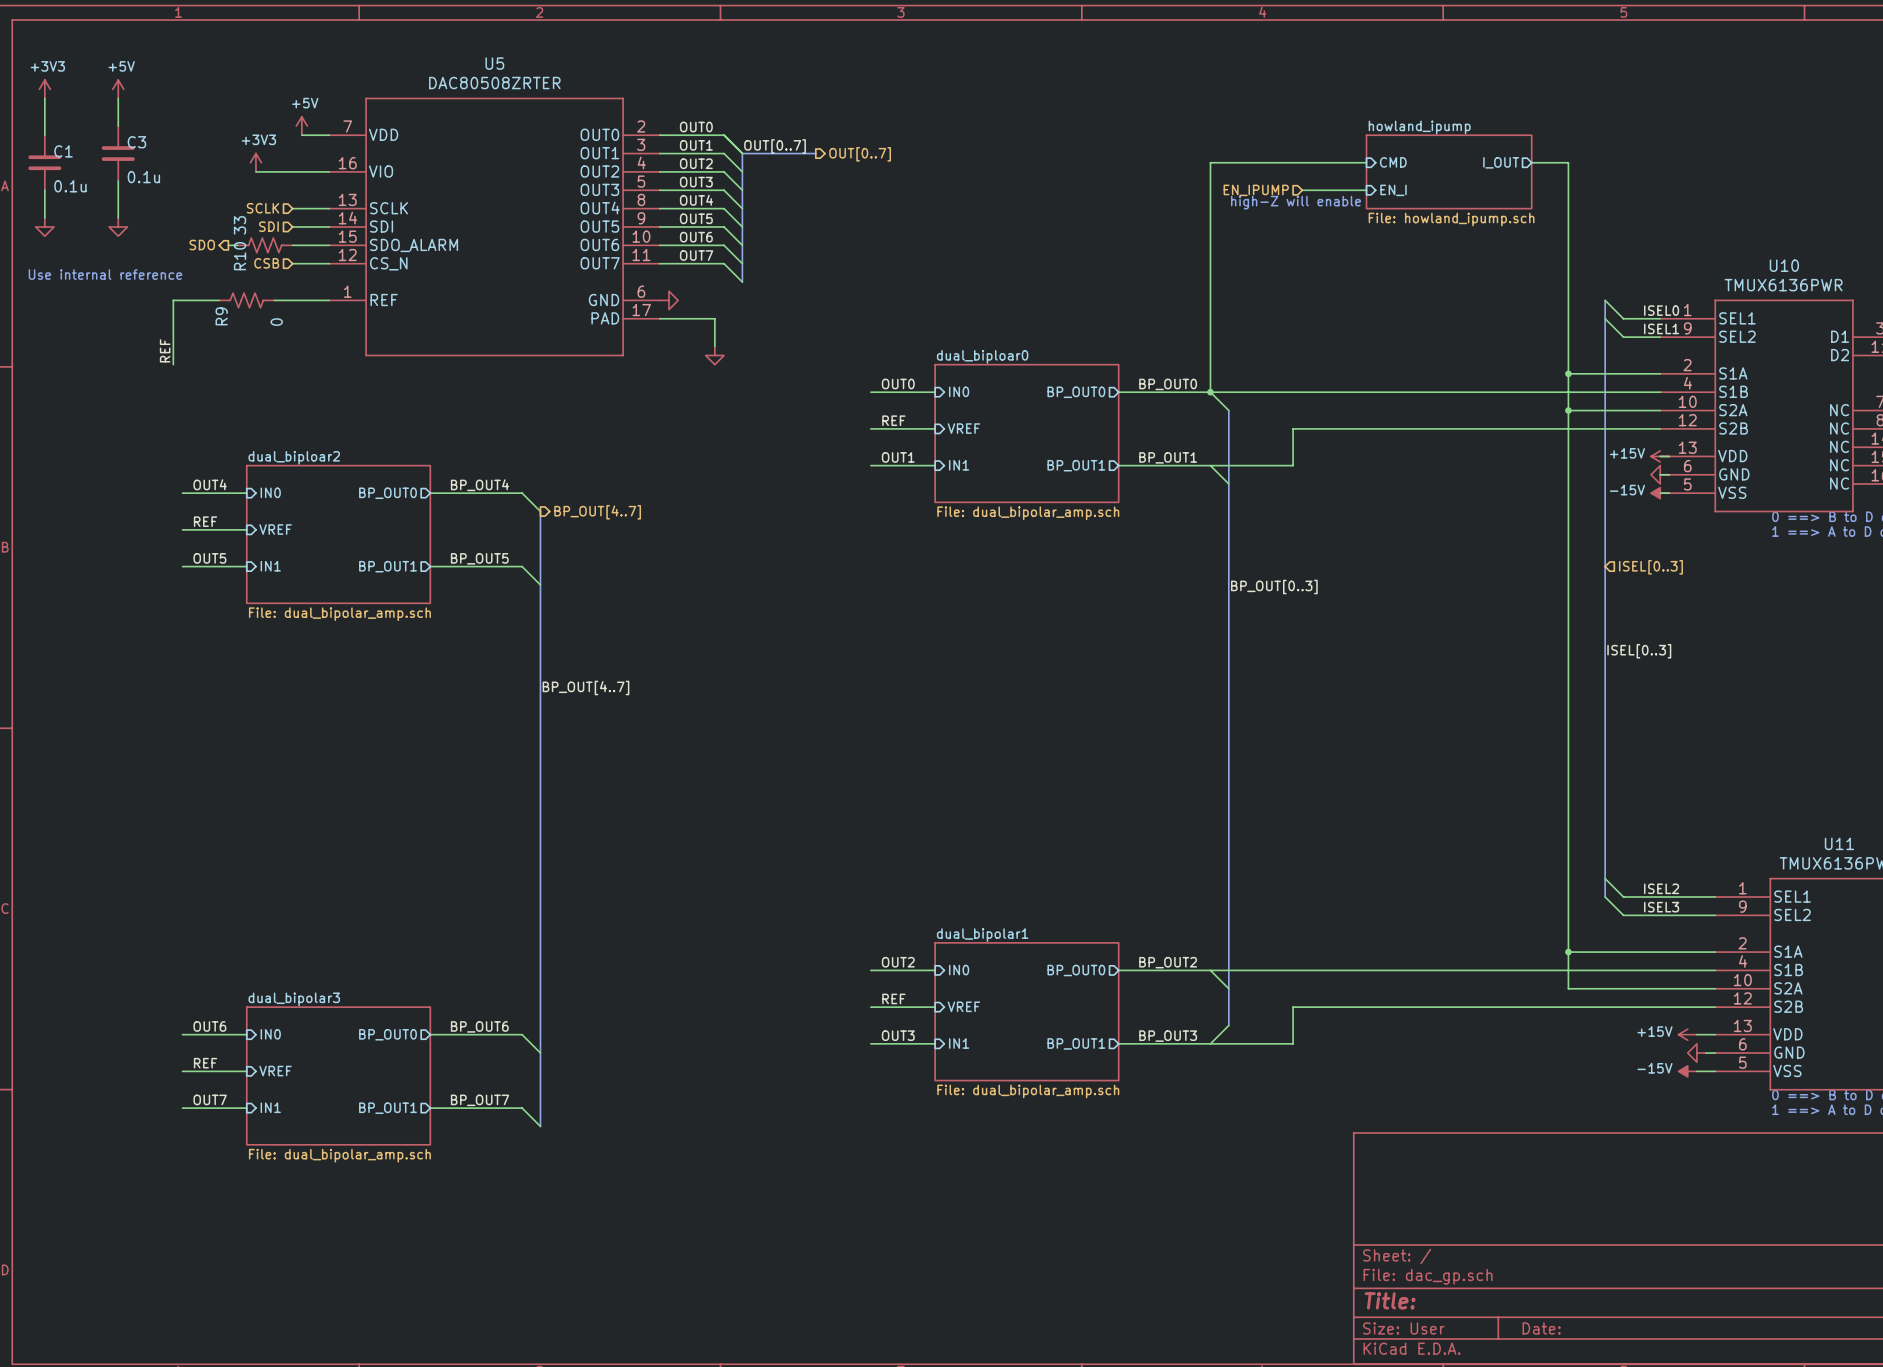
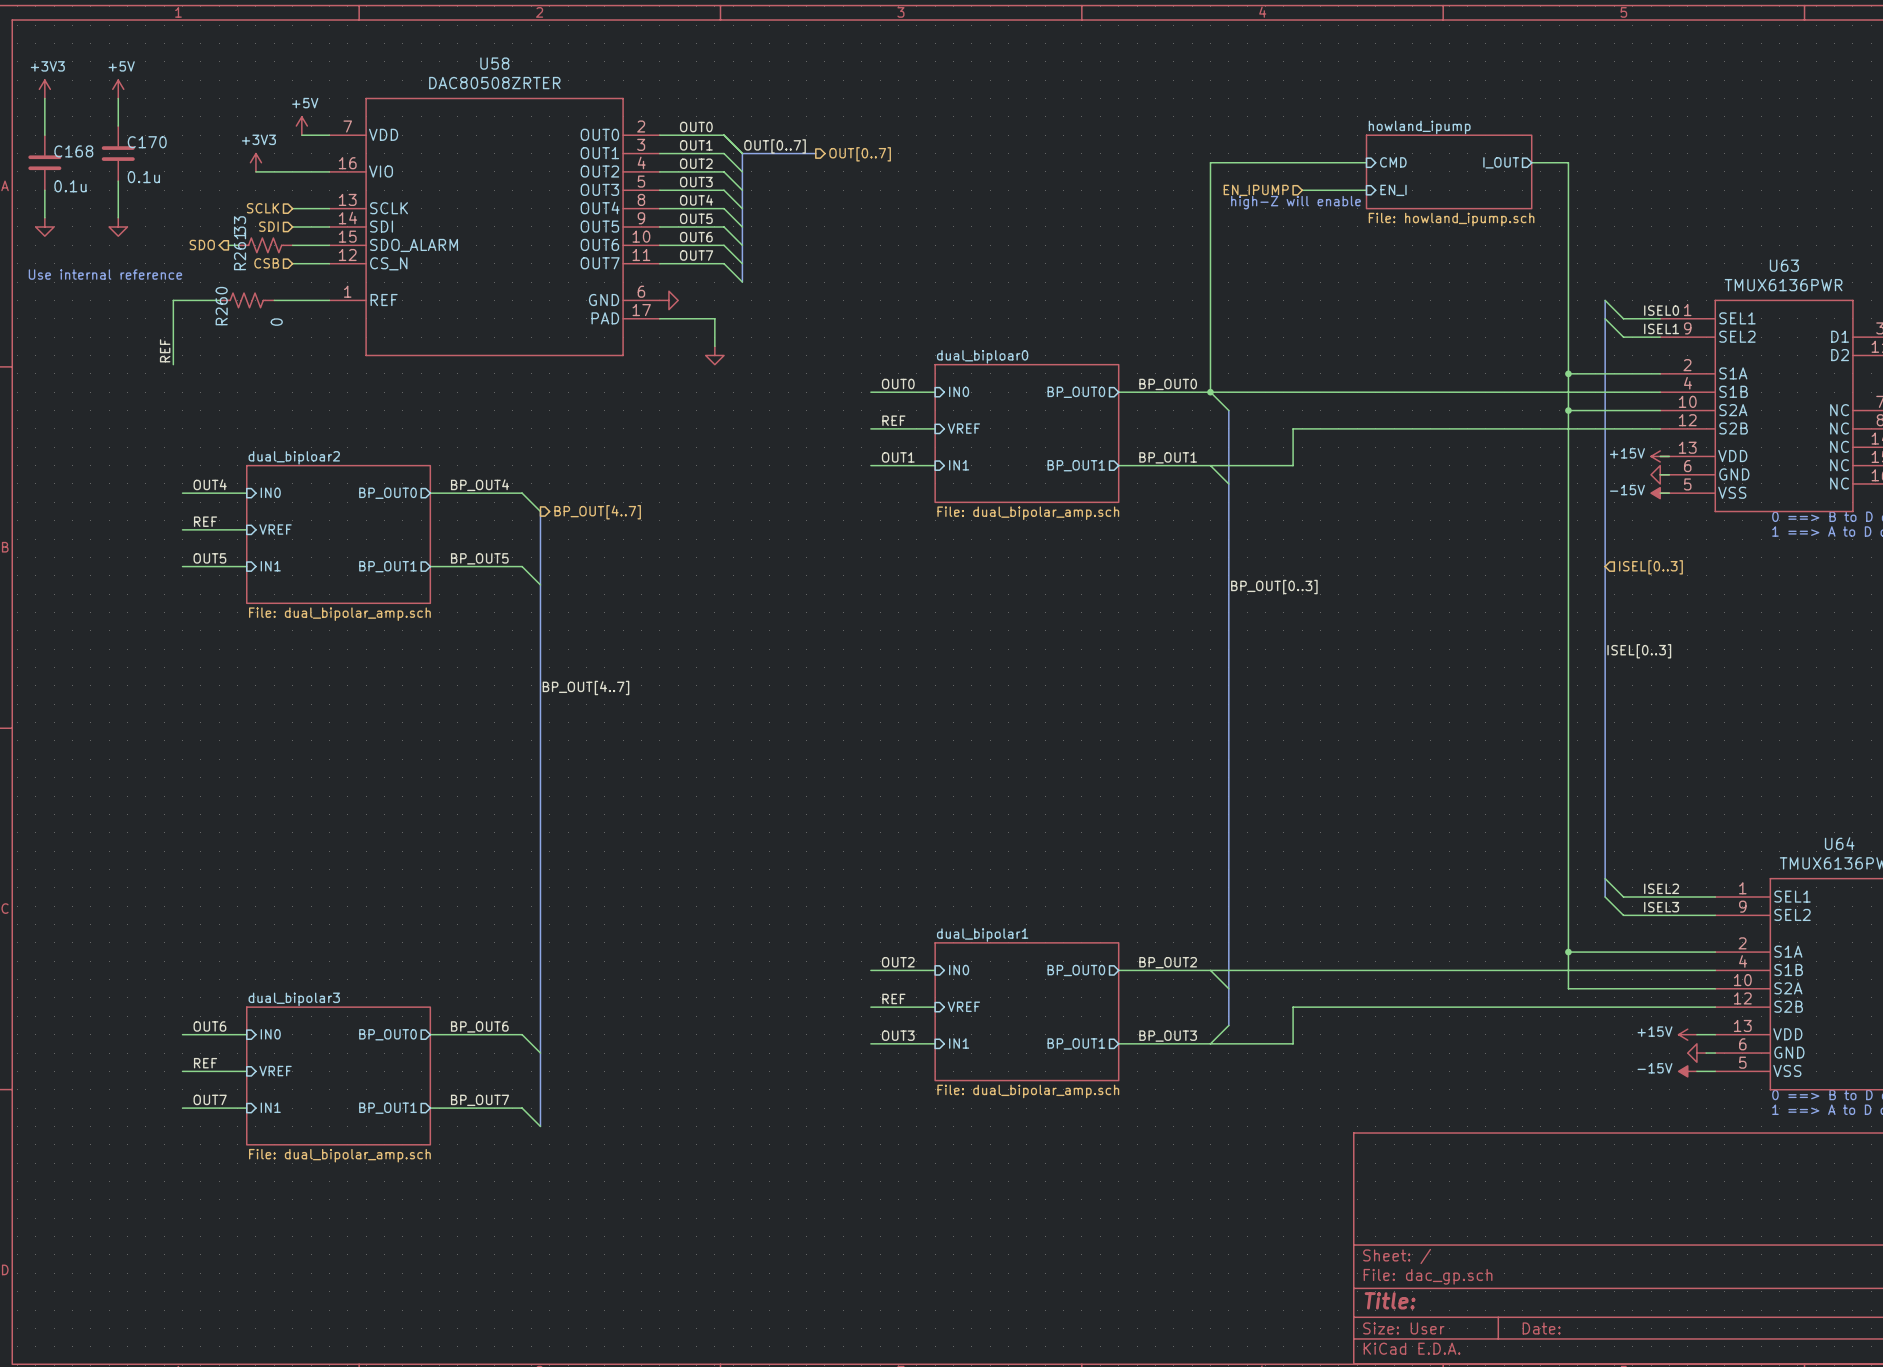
U5 name: U5 (494, 63) -> U58 (494, 63)
C3 name: C3 (136, 142) -> C170 (147, 142)
C1 name: C1 (63, 151) -> C168 (73, 151)
R10 name: R10 (240, 256) -> R261 (240, 251)
U10 name: U10 (1784, 265) -> U63 (1784, 265)
R9 name: R9 (221, 316) -> R260 (221, 306)
U11 name: U11 (1839, 843) -> U64 (1839, 843)

